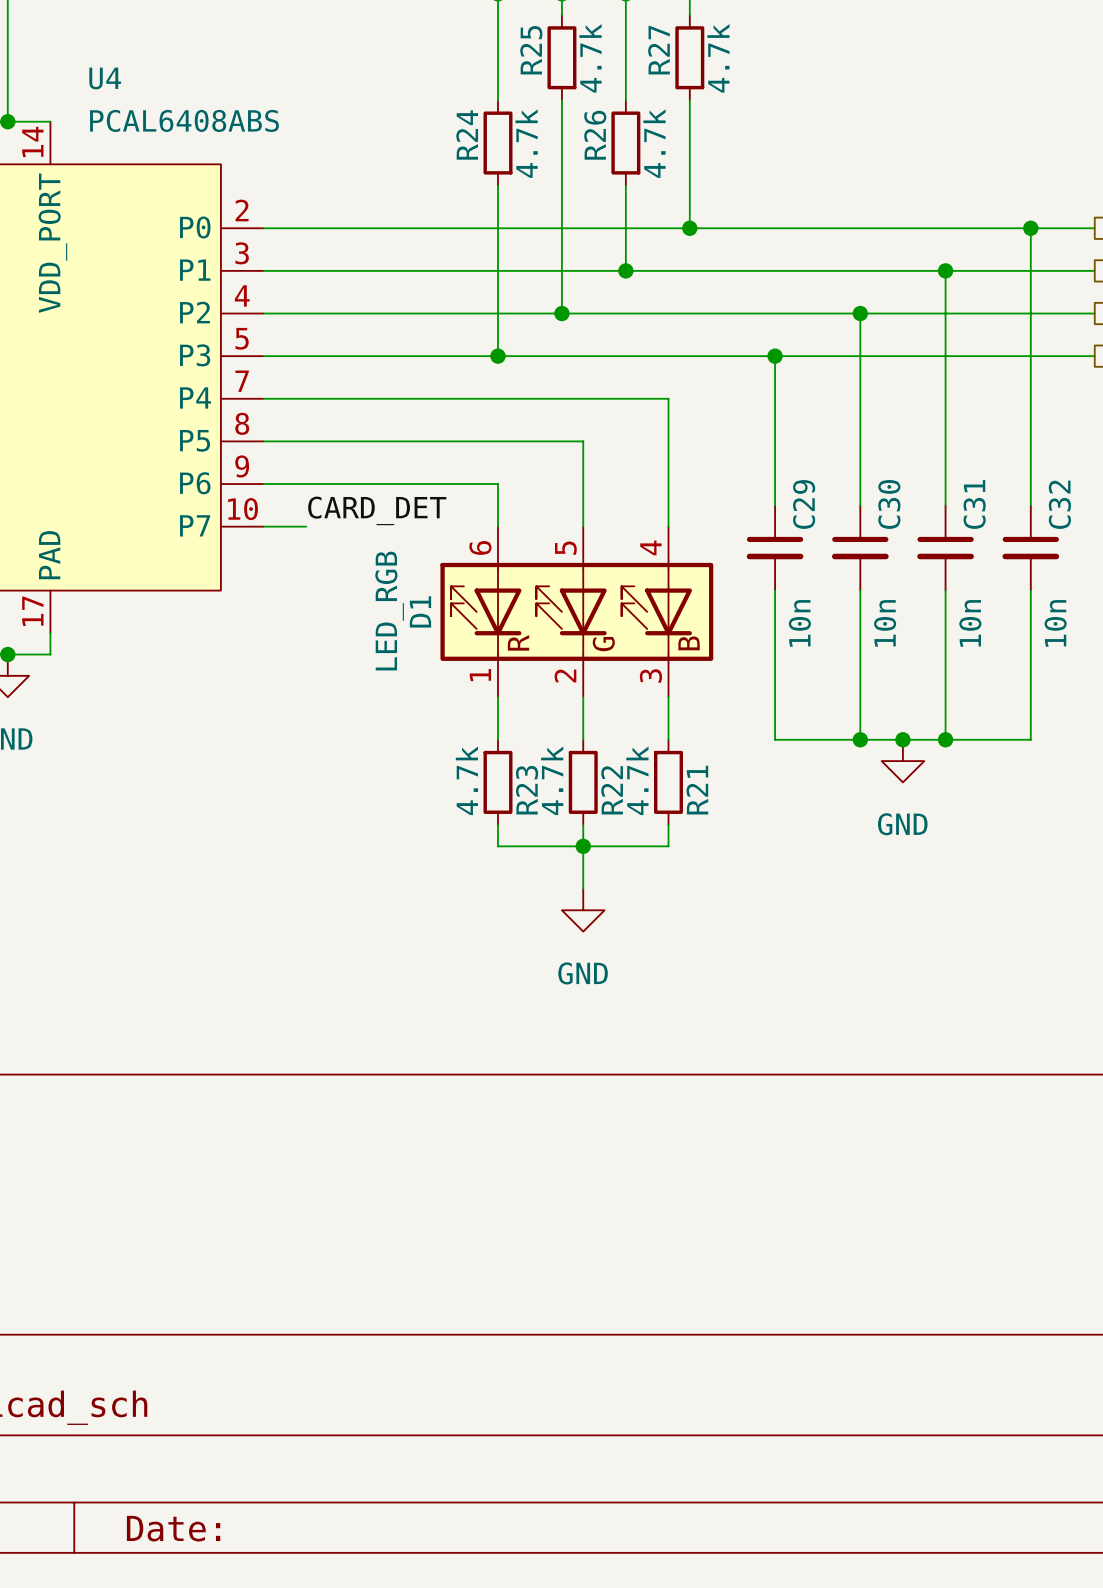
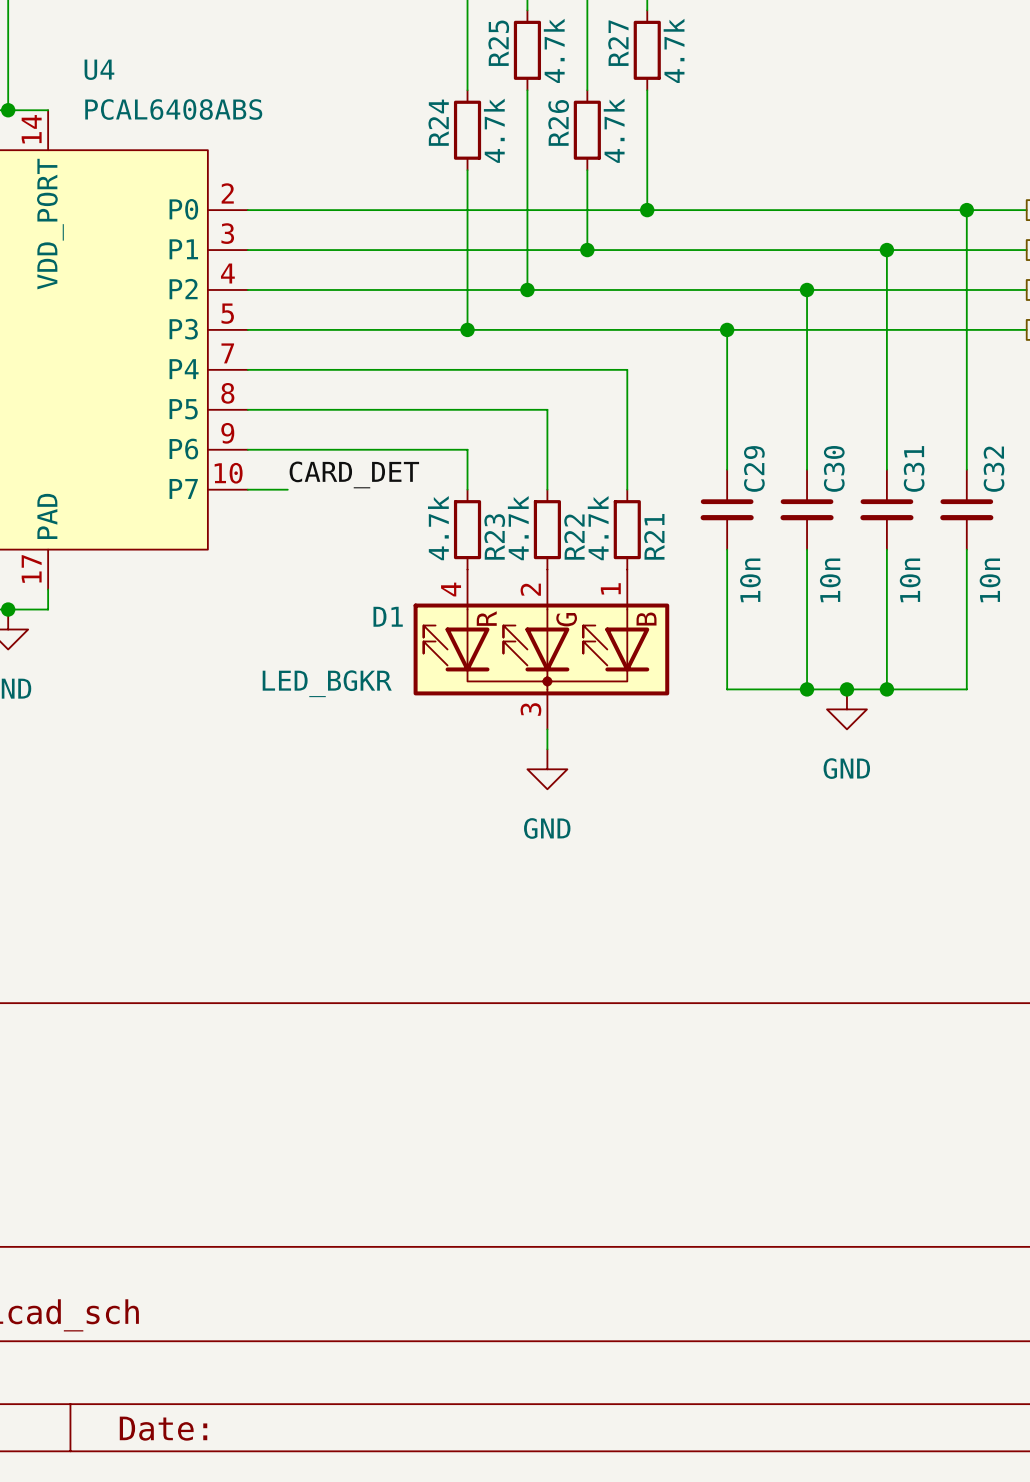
D1 symbol: [440, 526, 714, 698] -> [413, 569, 670, 730]
D1 value: LED_RGB (389, 611) -> LED_BGKR (327, 683)
D1 name position: D1 (420, 611) -> D1 (388, 616)
R23 position: (497, 782) -> (467, 529)
wire: none -> (547, 729) (547, 749)
R22 position: (583, 782) -> (547, 529)
R21 position: (668, 782) -> (627, 529)
wire: (497, 825) (497, 846) (668, 846) (668, 825) -> none
wire: (583, 825) (583, 888) -> none
junction: (583, 846) -> none
power symbol position: GND (583, 910) -> GND (547, 769)

